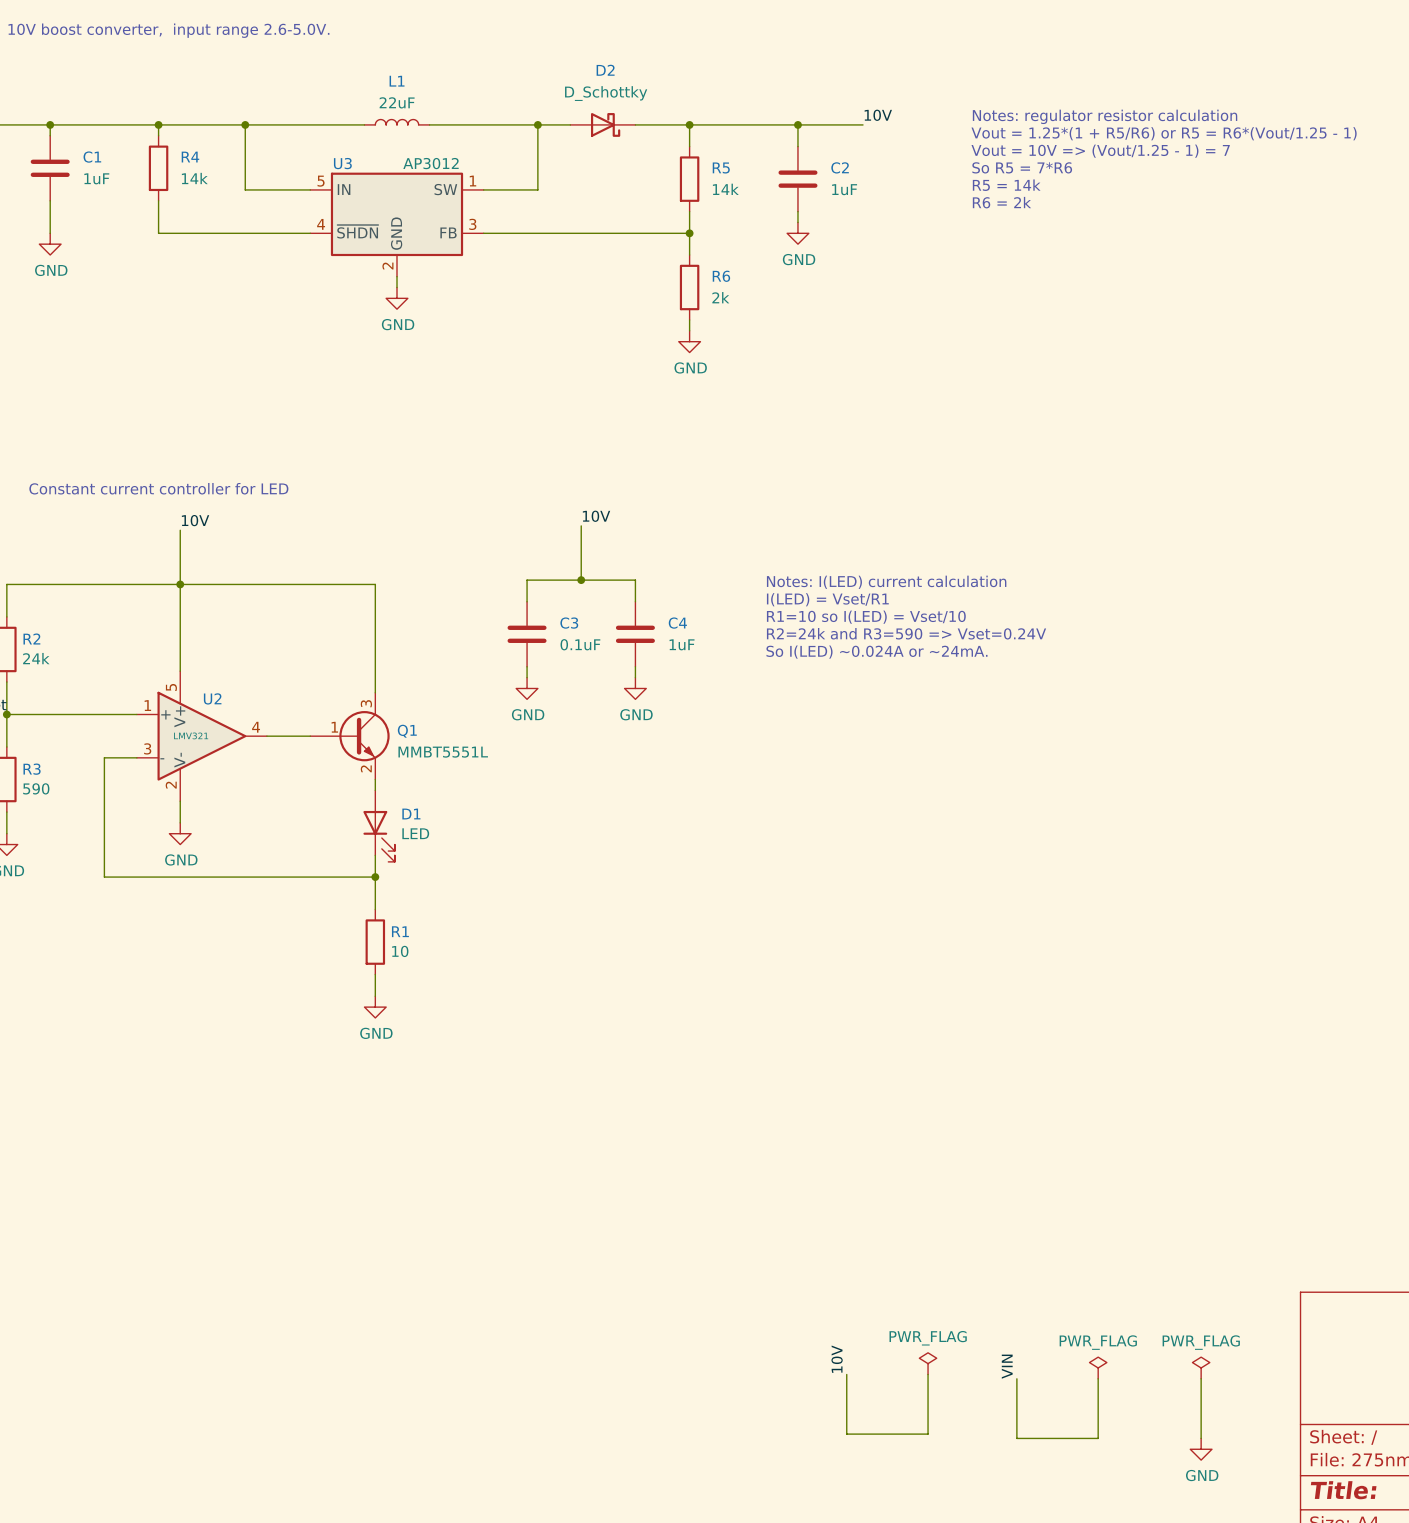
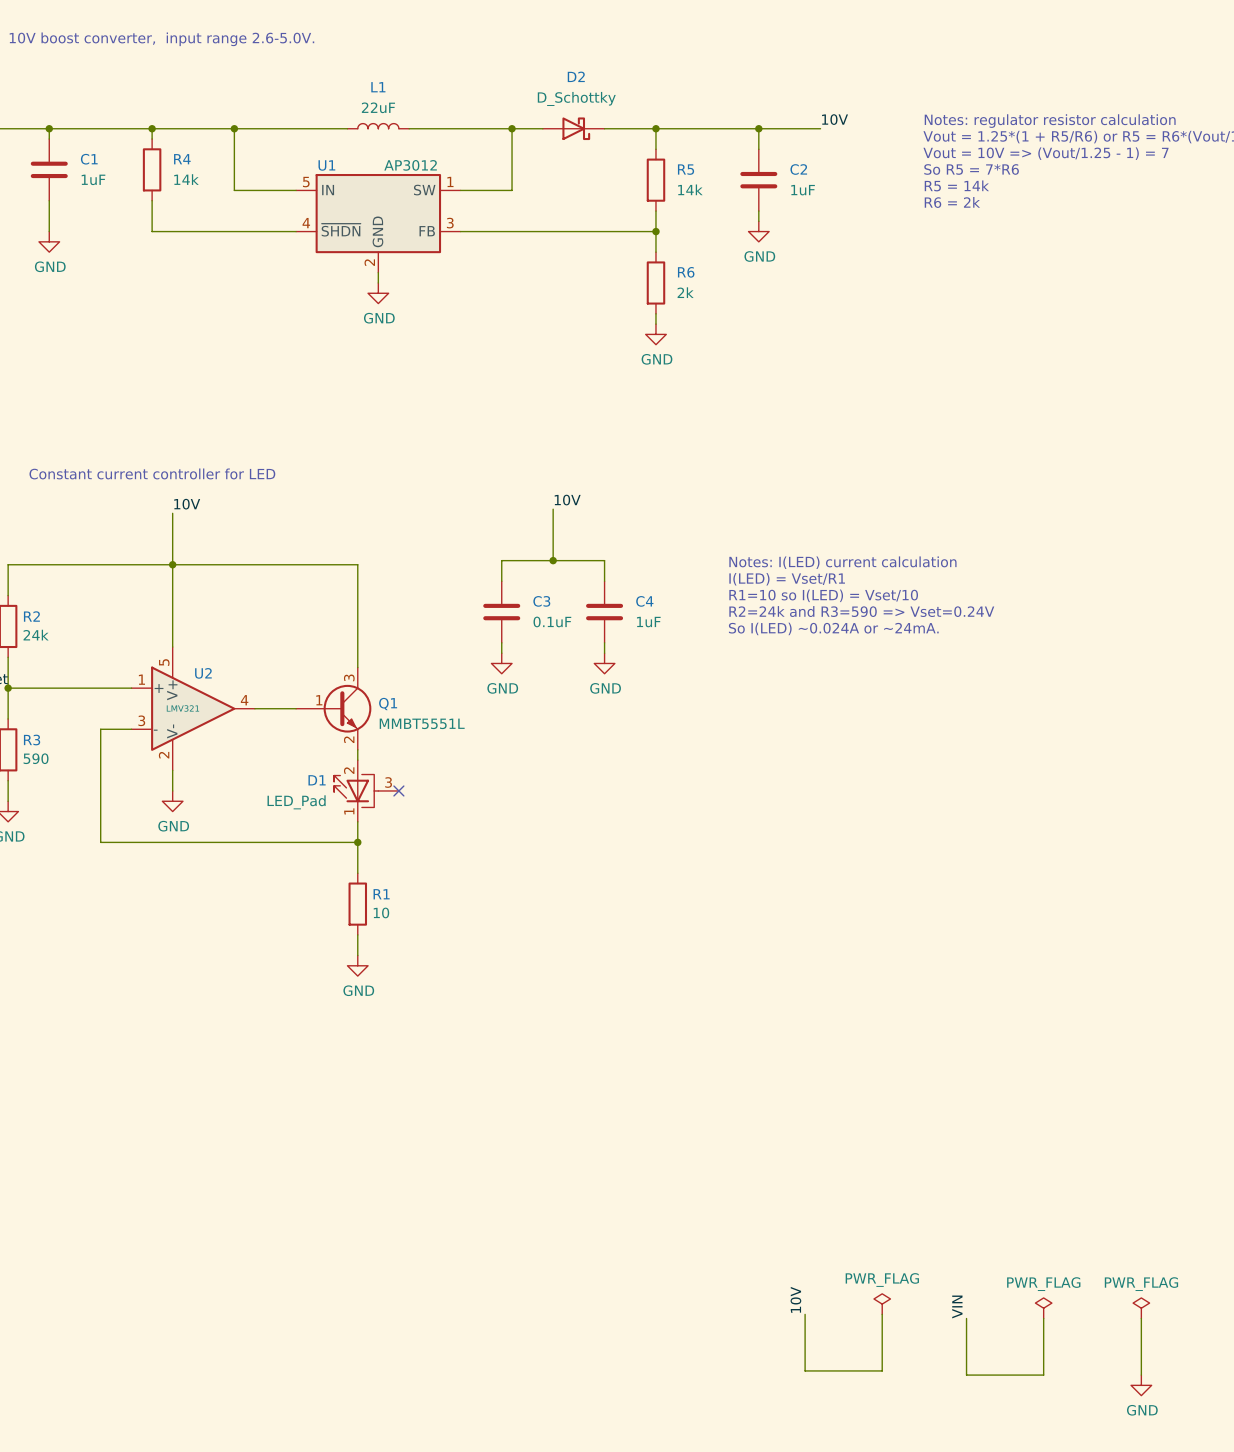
U3 name: U3 (342, 163) -> U1 (326, 165)
D1 symbol: [363, 790, 395, 862] -> [334, 760, 399, 822]
D1 name position: D1 (411, 814) -> D1 (317, 780)
no-connect mark: none -> (398, 790)
D1 value: LED (415, 833) -> LED_Pad (296, 802)

